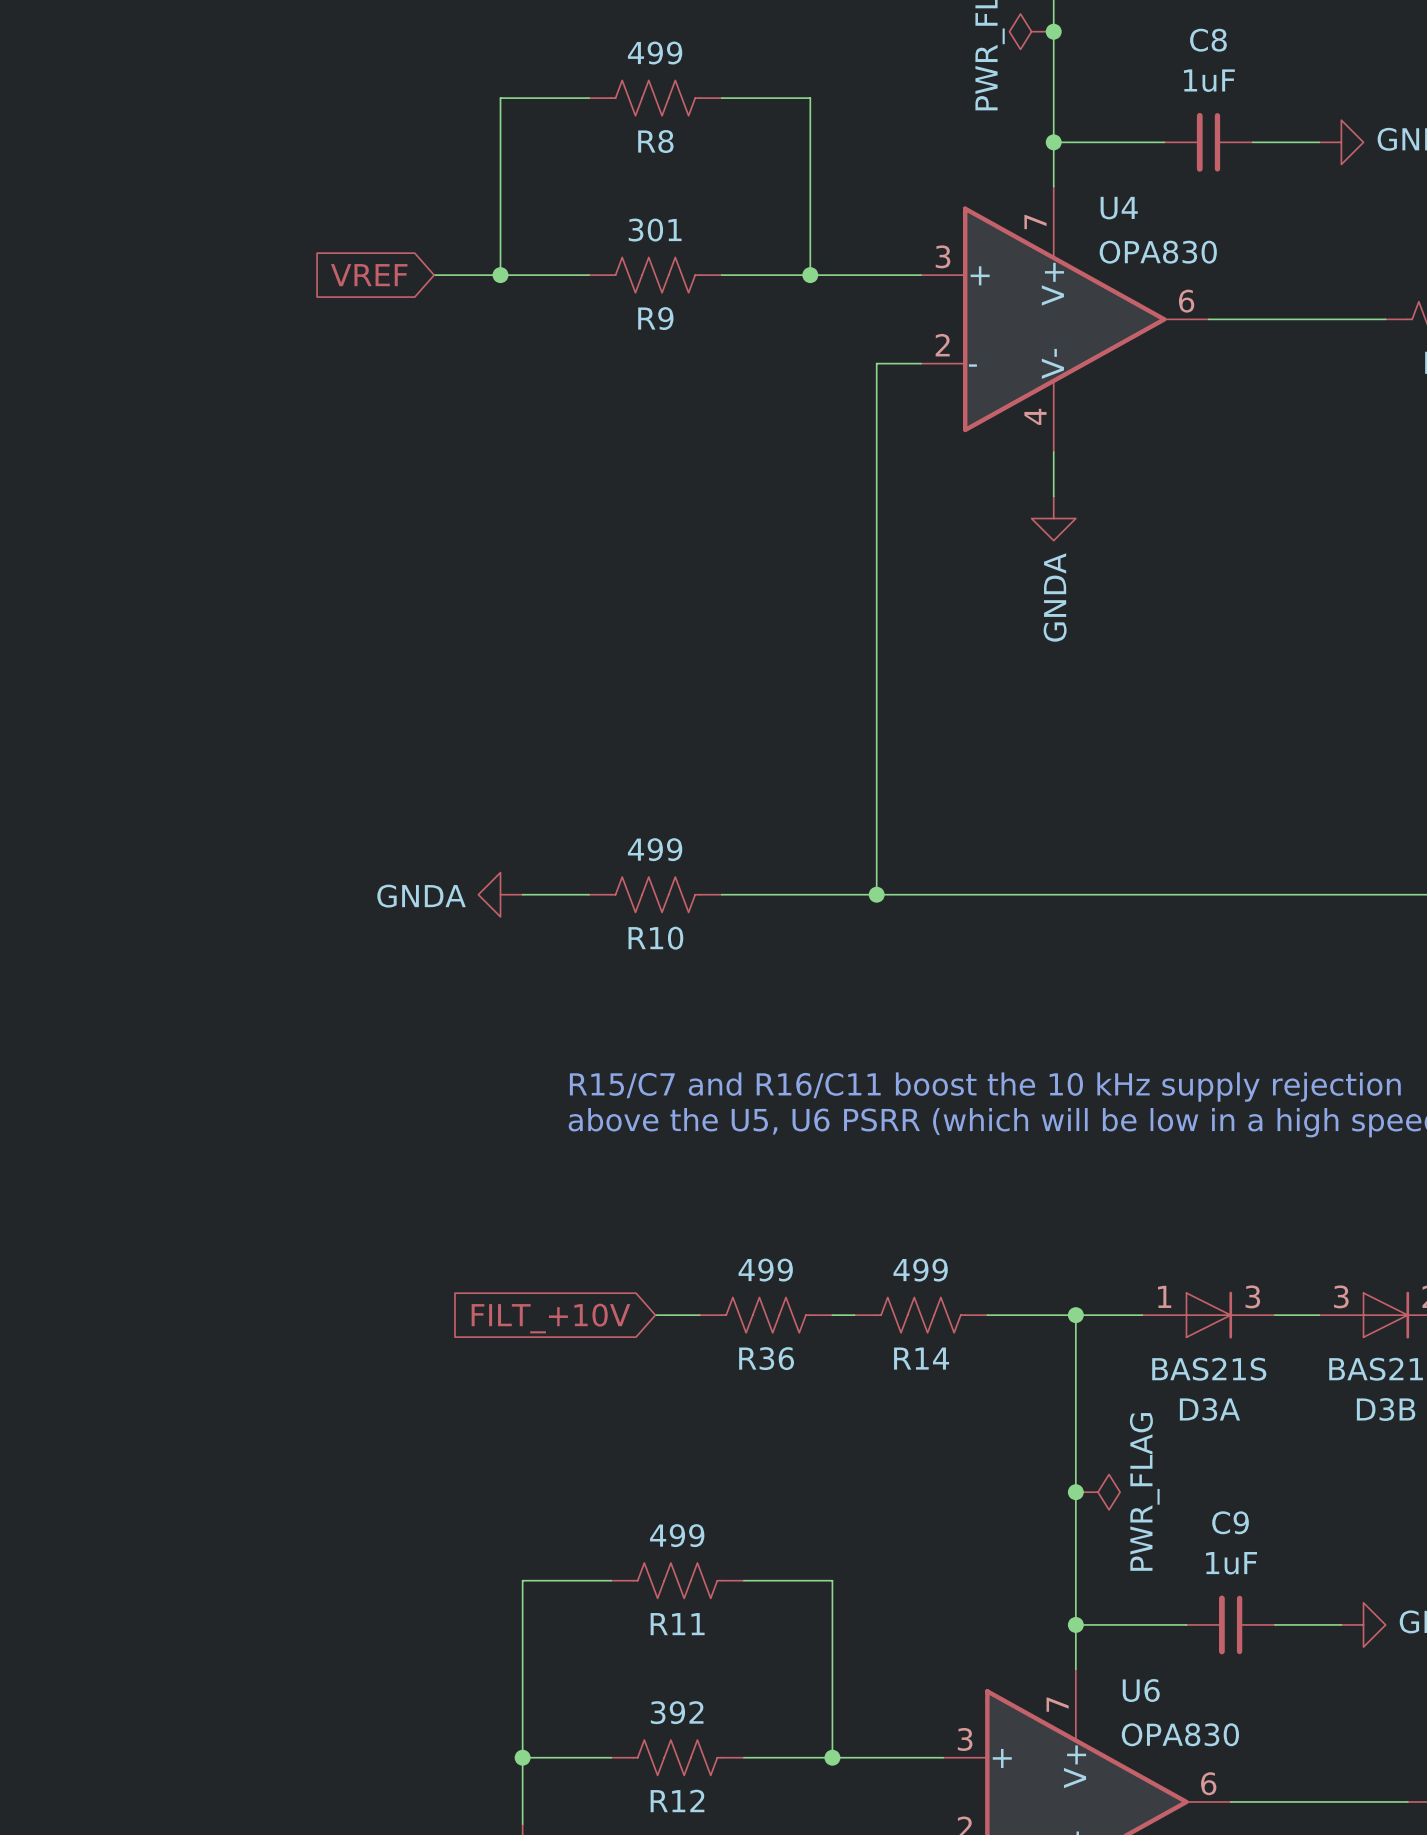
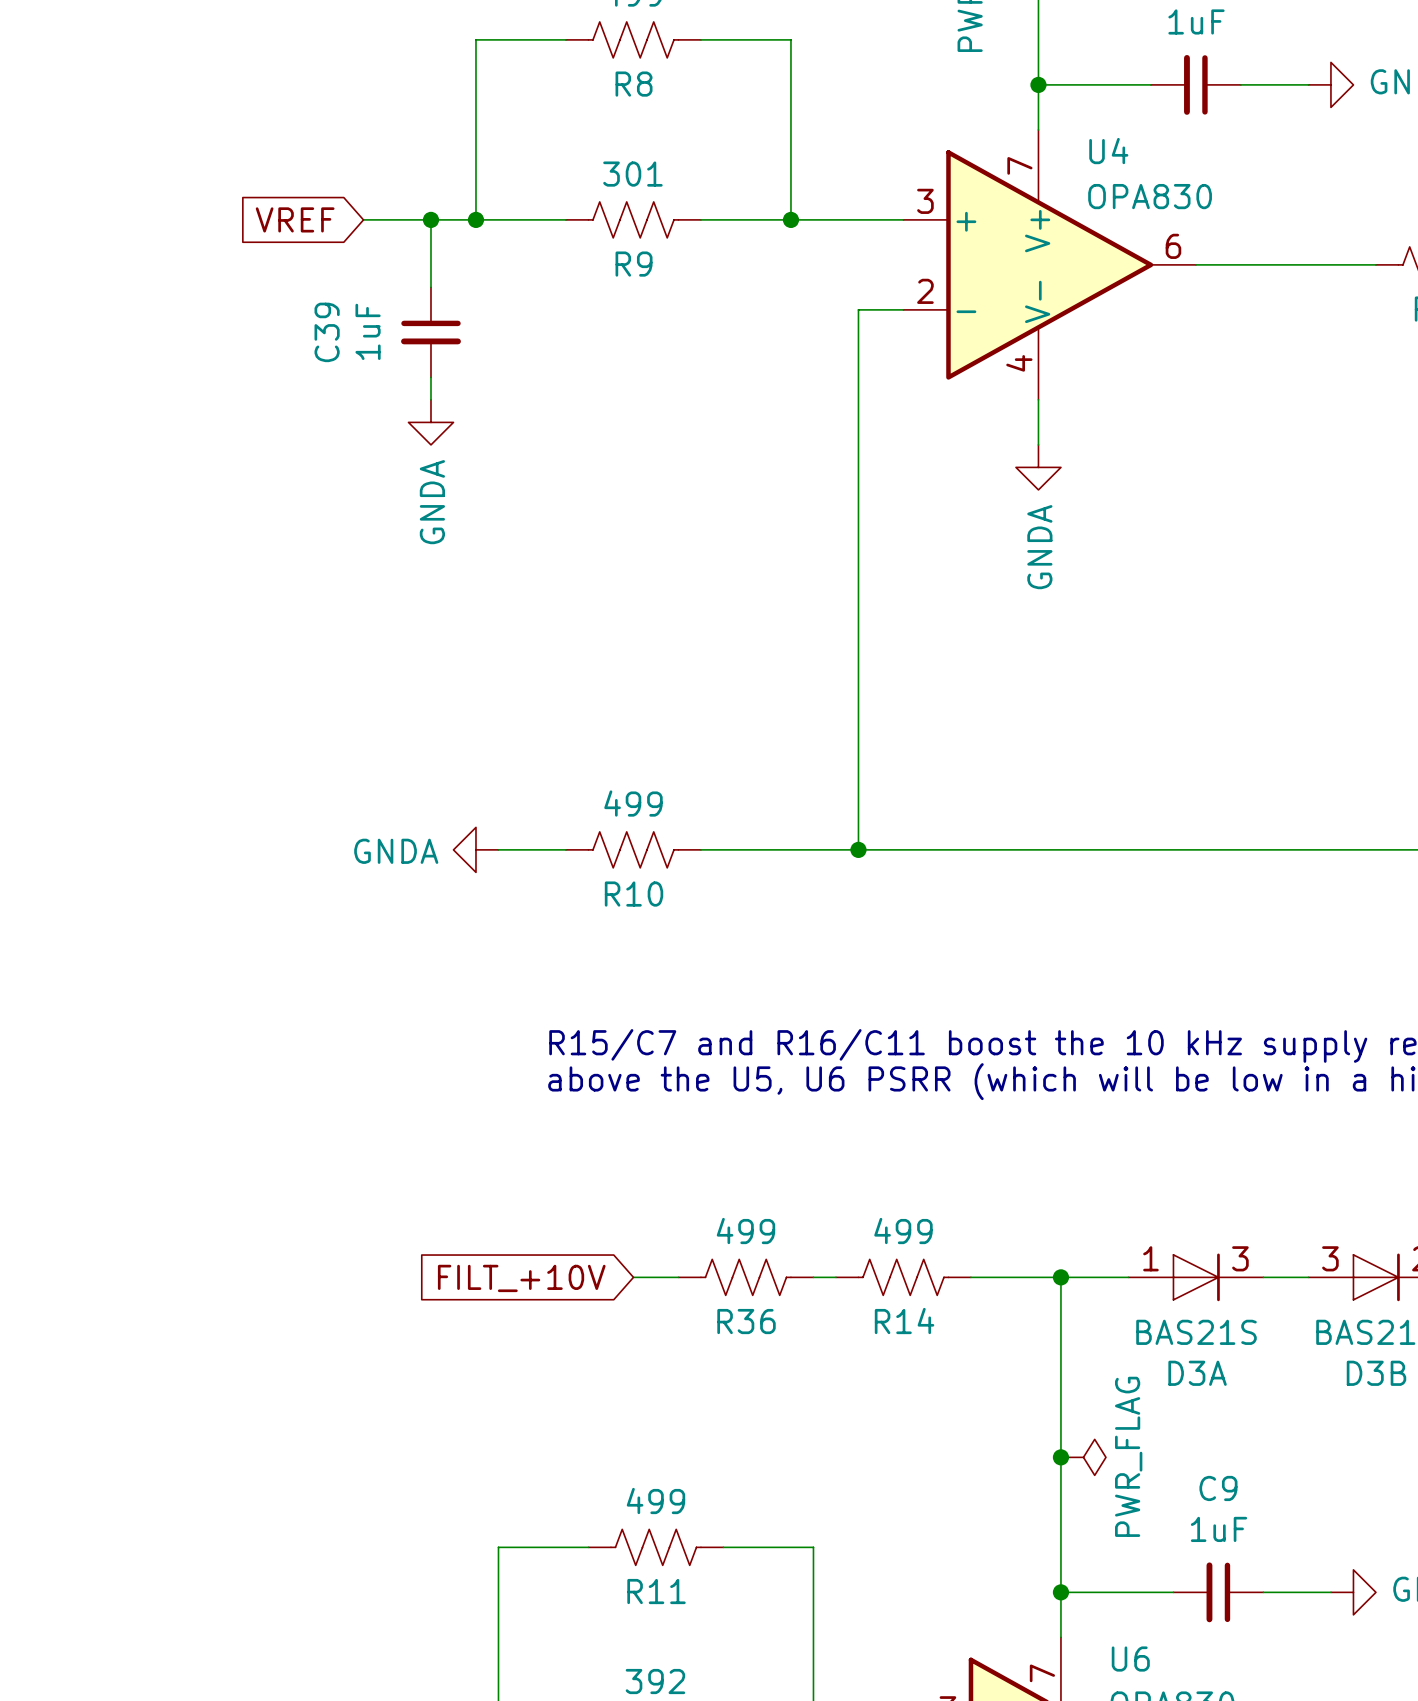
global label position: VREF (369, 275) -> VREF (295, 219)
wire: none -> (363, 219) (408, 219)
wire: none -> (430, 219) (430, 287)
junction: none -> (430, 219)
C39: none -> 1uF (430, 332)
wire: none -> (430, 377) (430, 399)
power symbol: none -> GNDA (430, 422)

